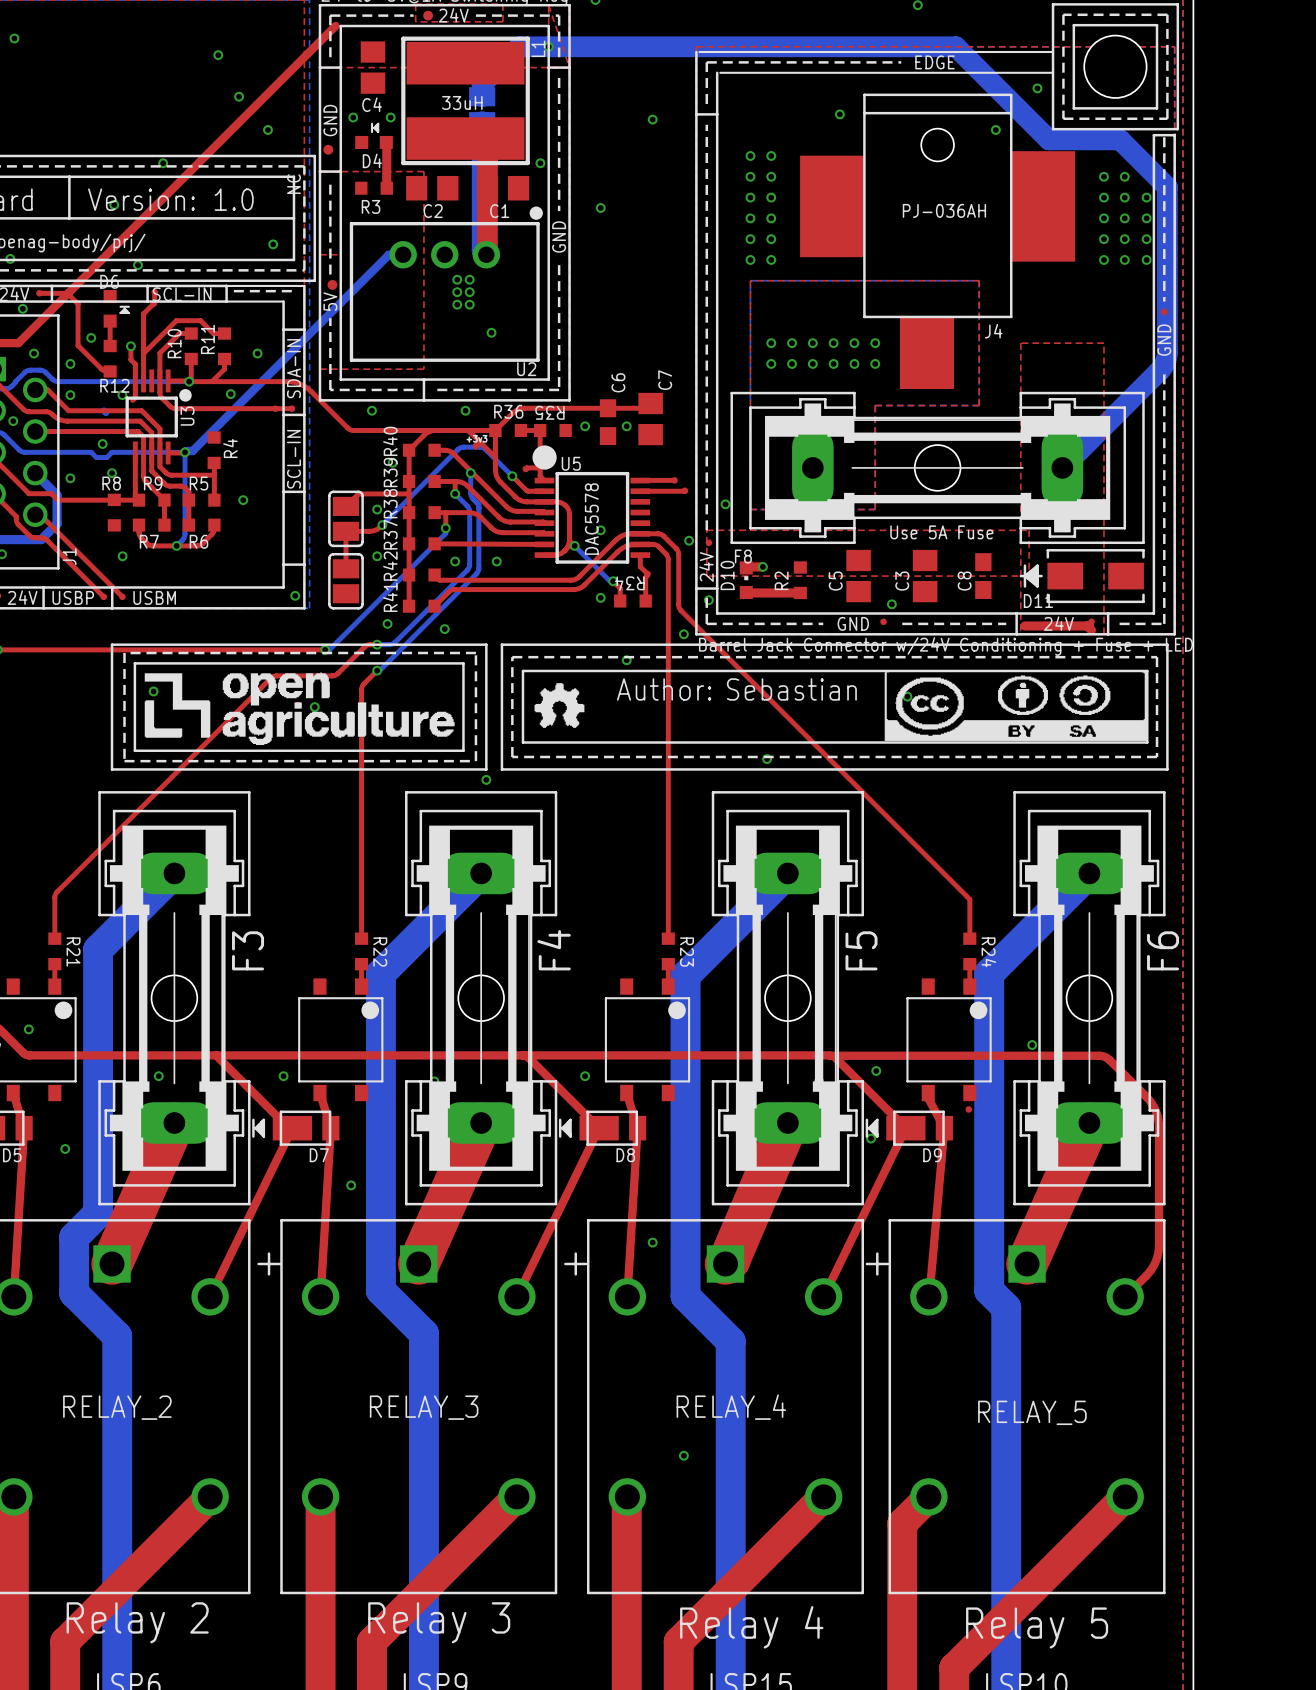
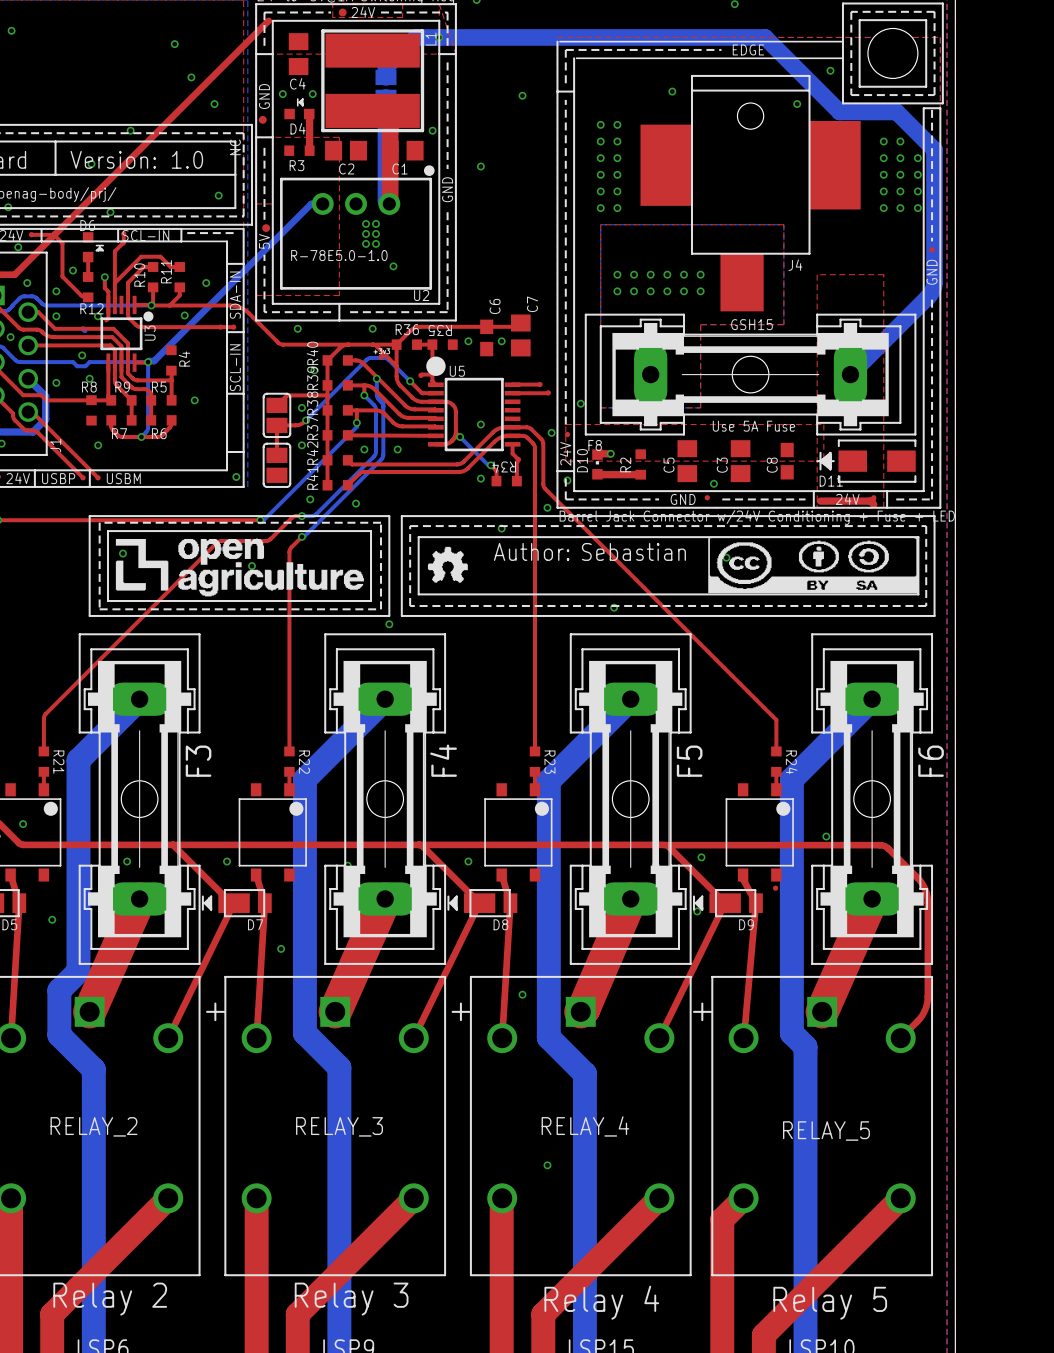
L1 value: 33uH (462, 102) -> none
J4 value: PJ-036AH (944, 210) -> none
U2 value: none -> R-78E5.0-1.0 (339, 255)
F8 value: none -> GSH15 (751, 324)
U5 value: DAC5578 (591, 519) -> none

